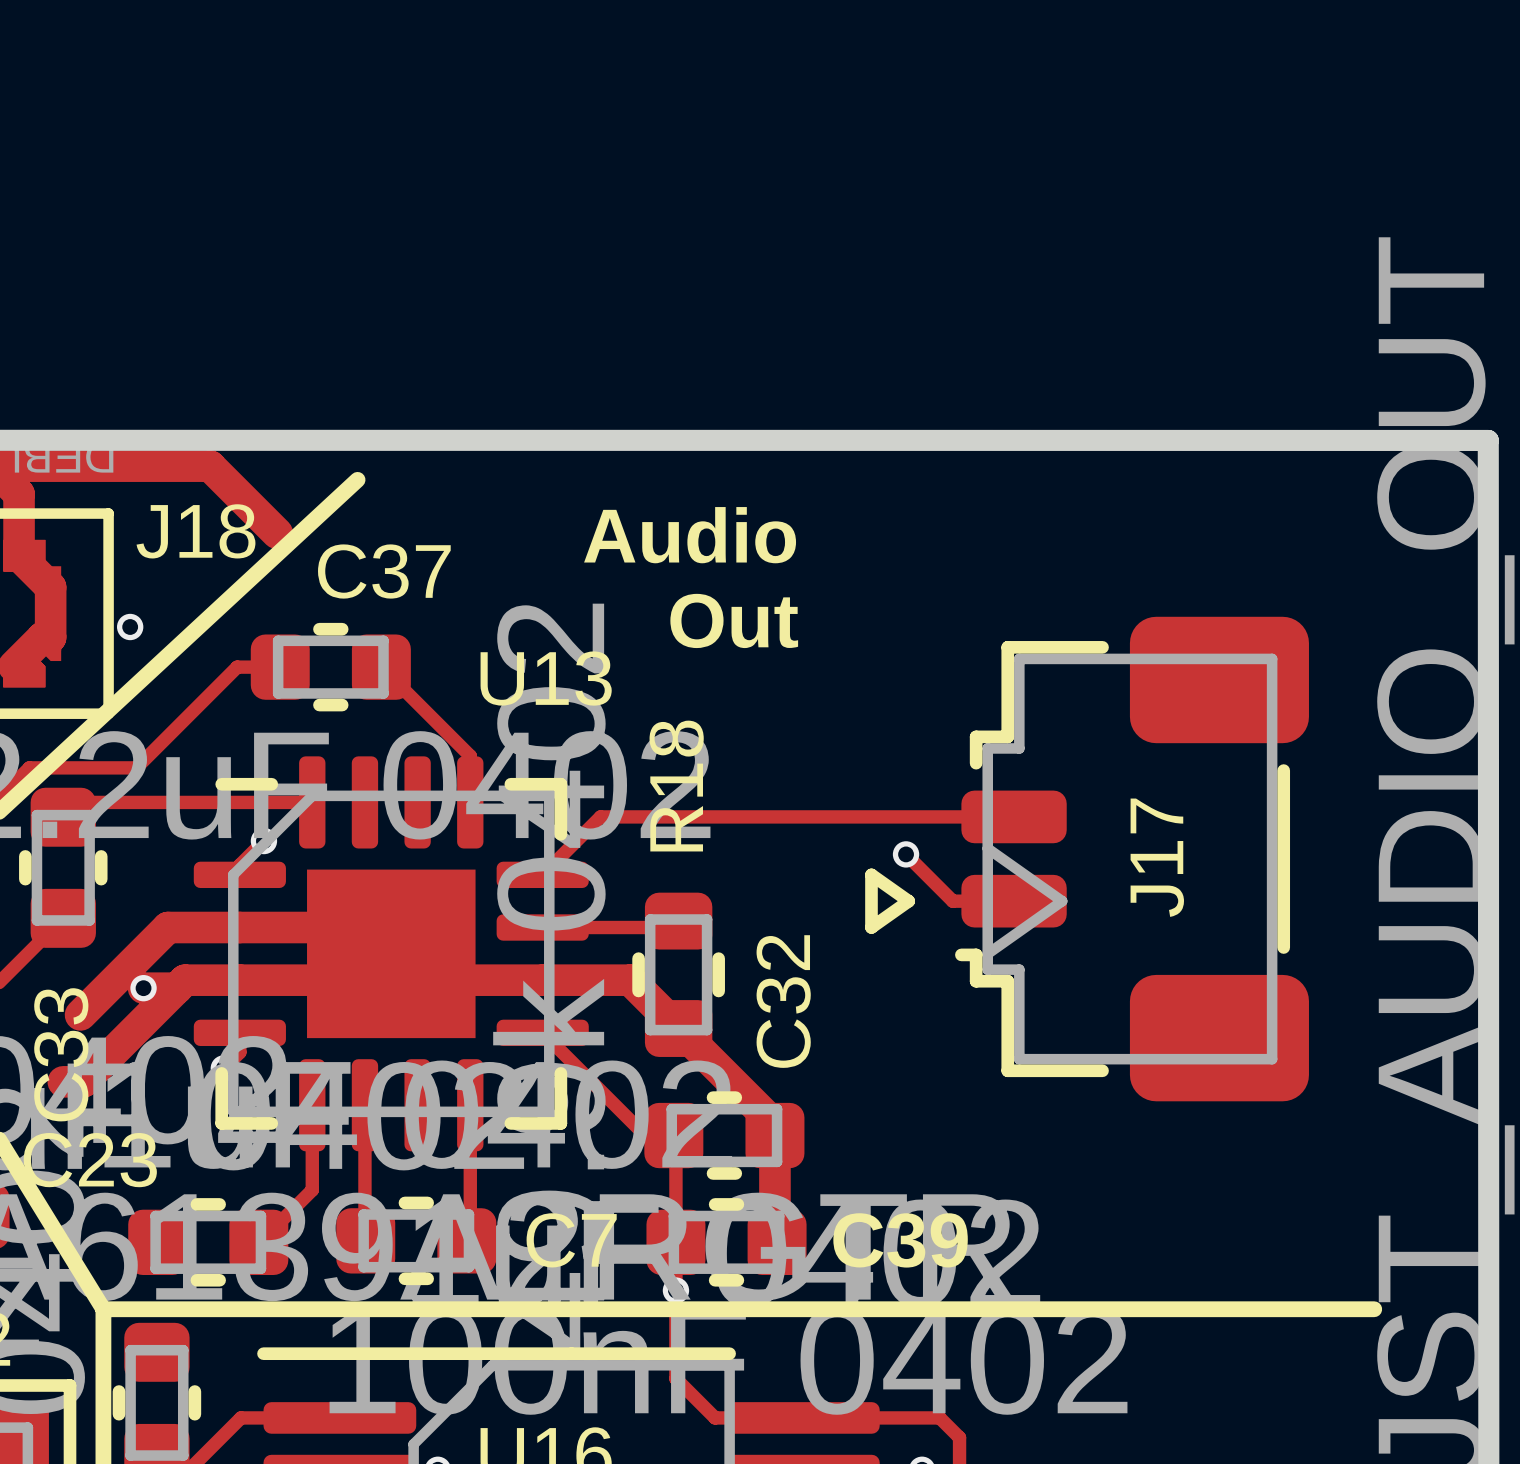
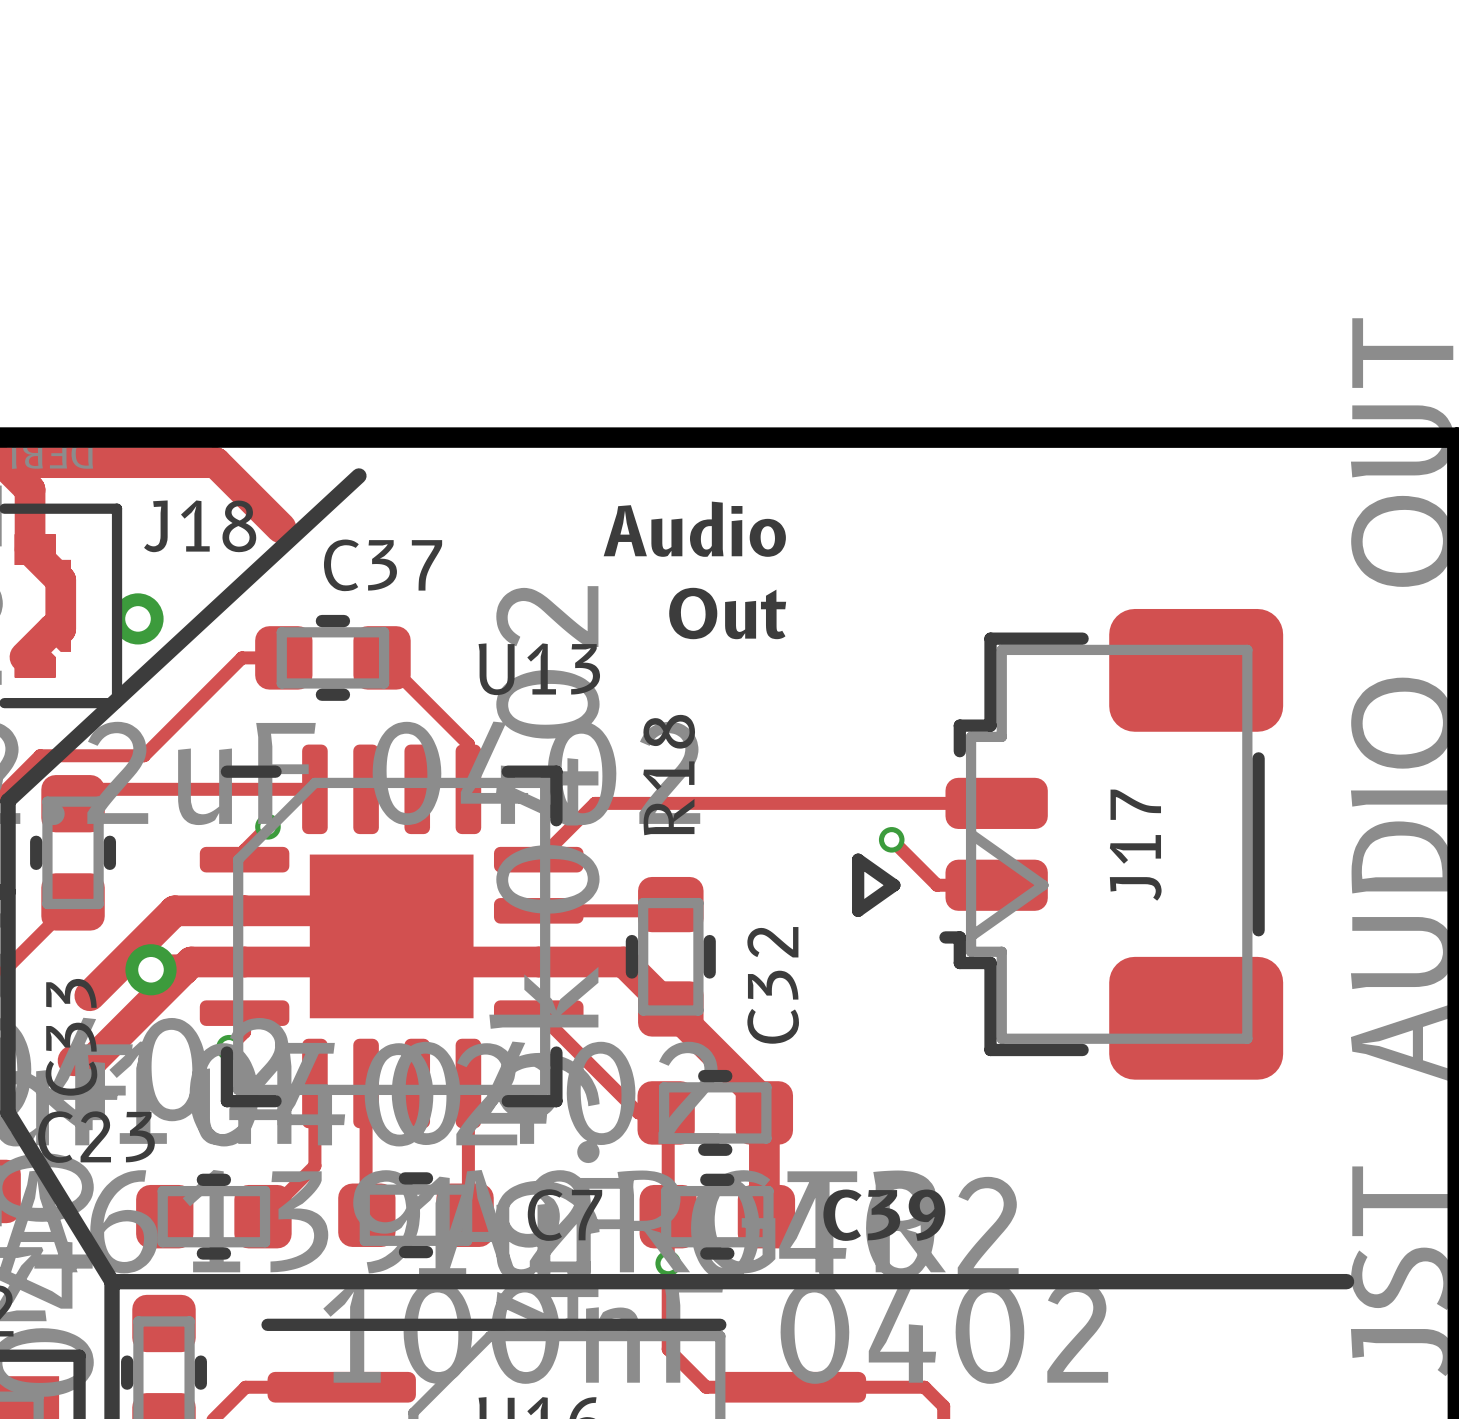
via size: [117, 613, 144, 641] -> [112, 593, 164, 645]
via size: [130, 975, 157, 1002] -> [125, 944, 177, 996]

